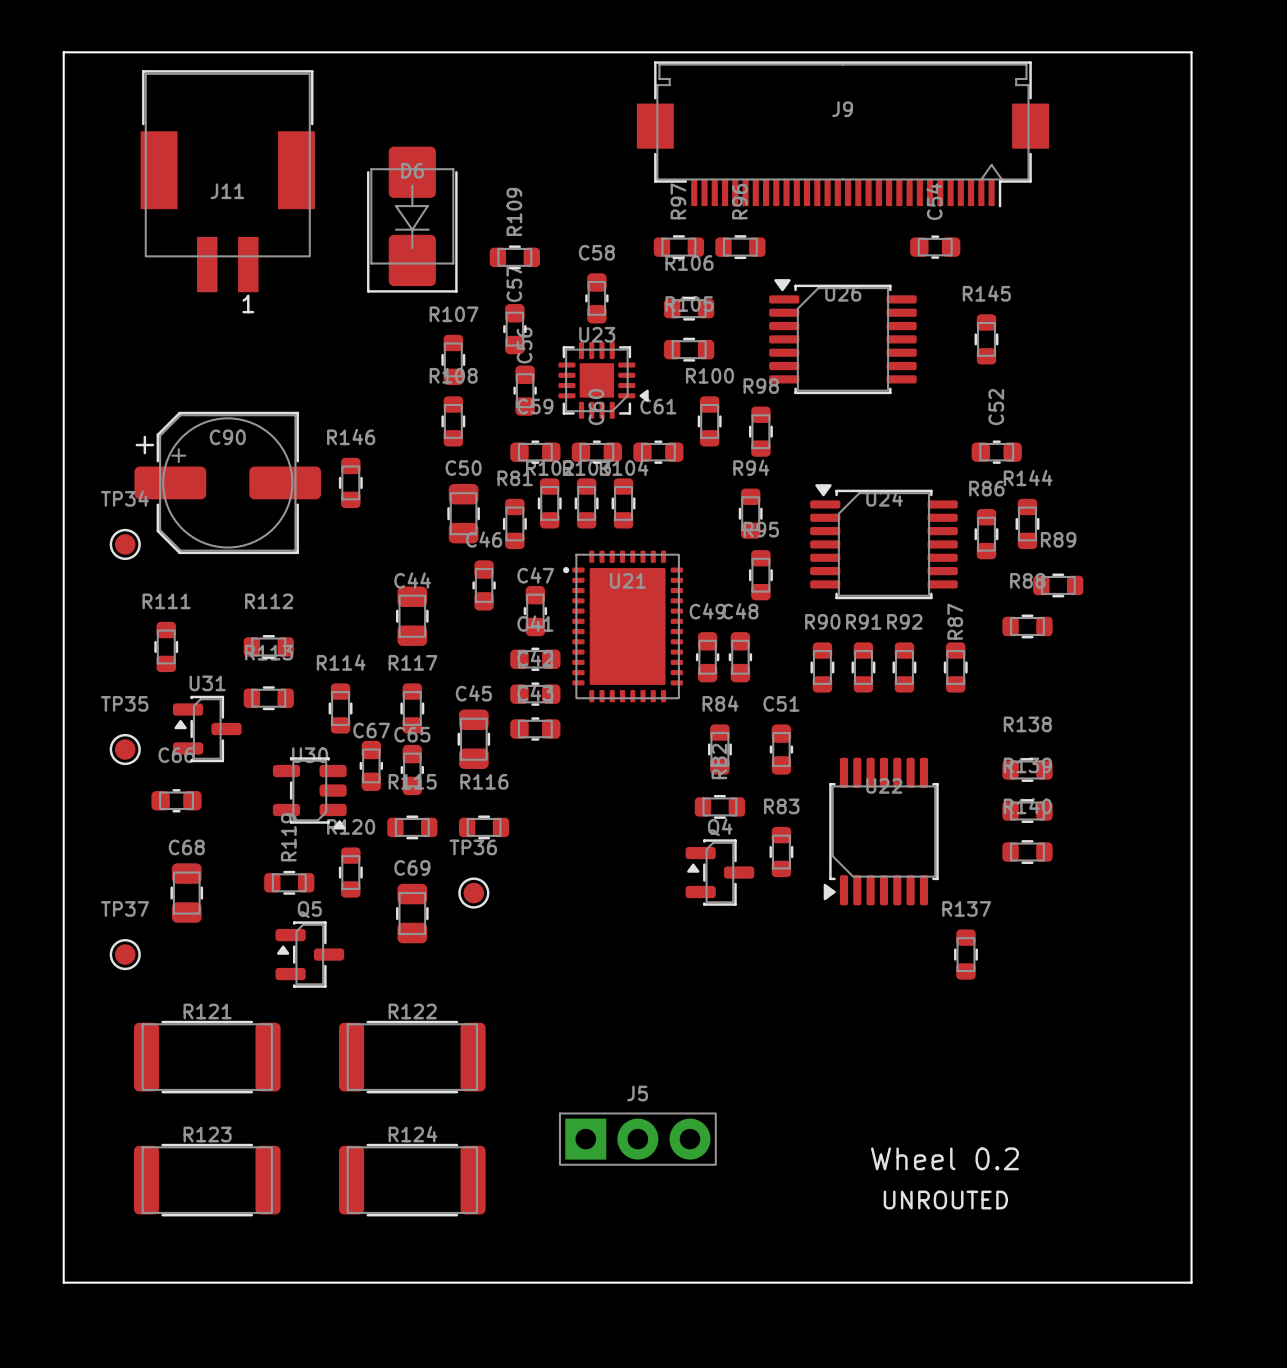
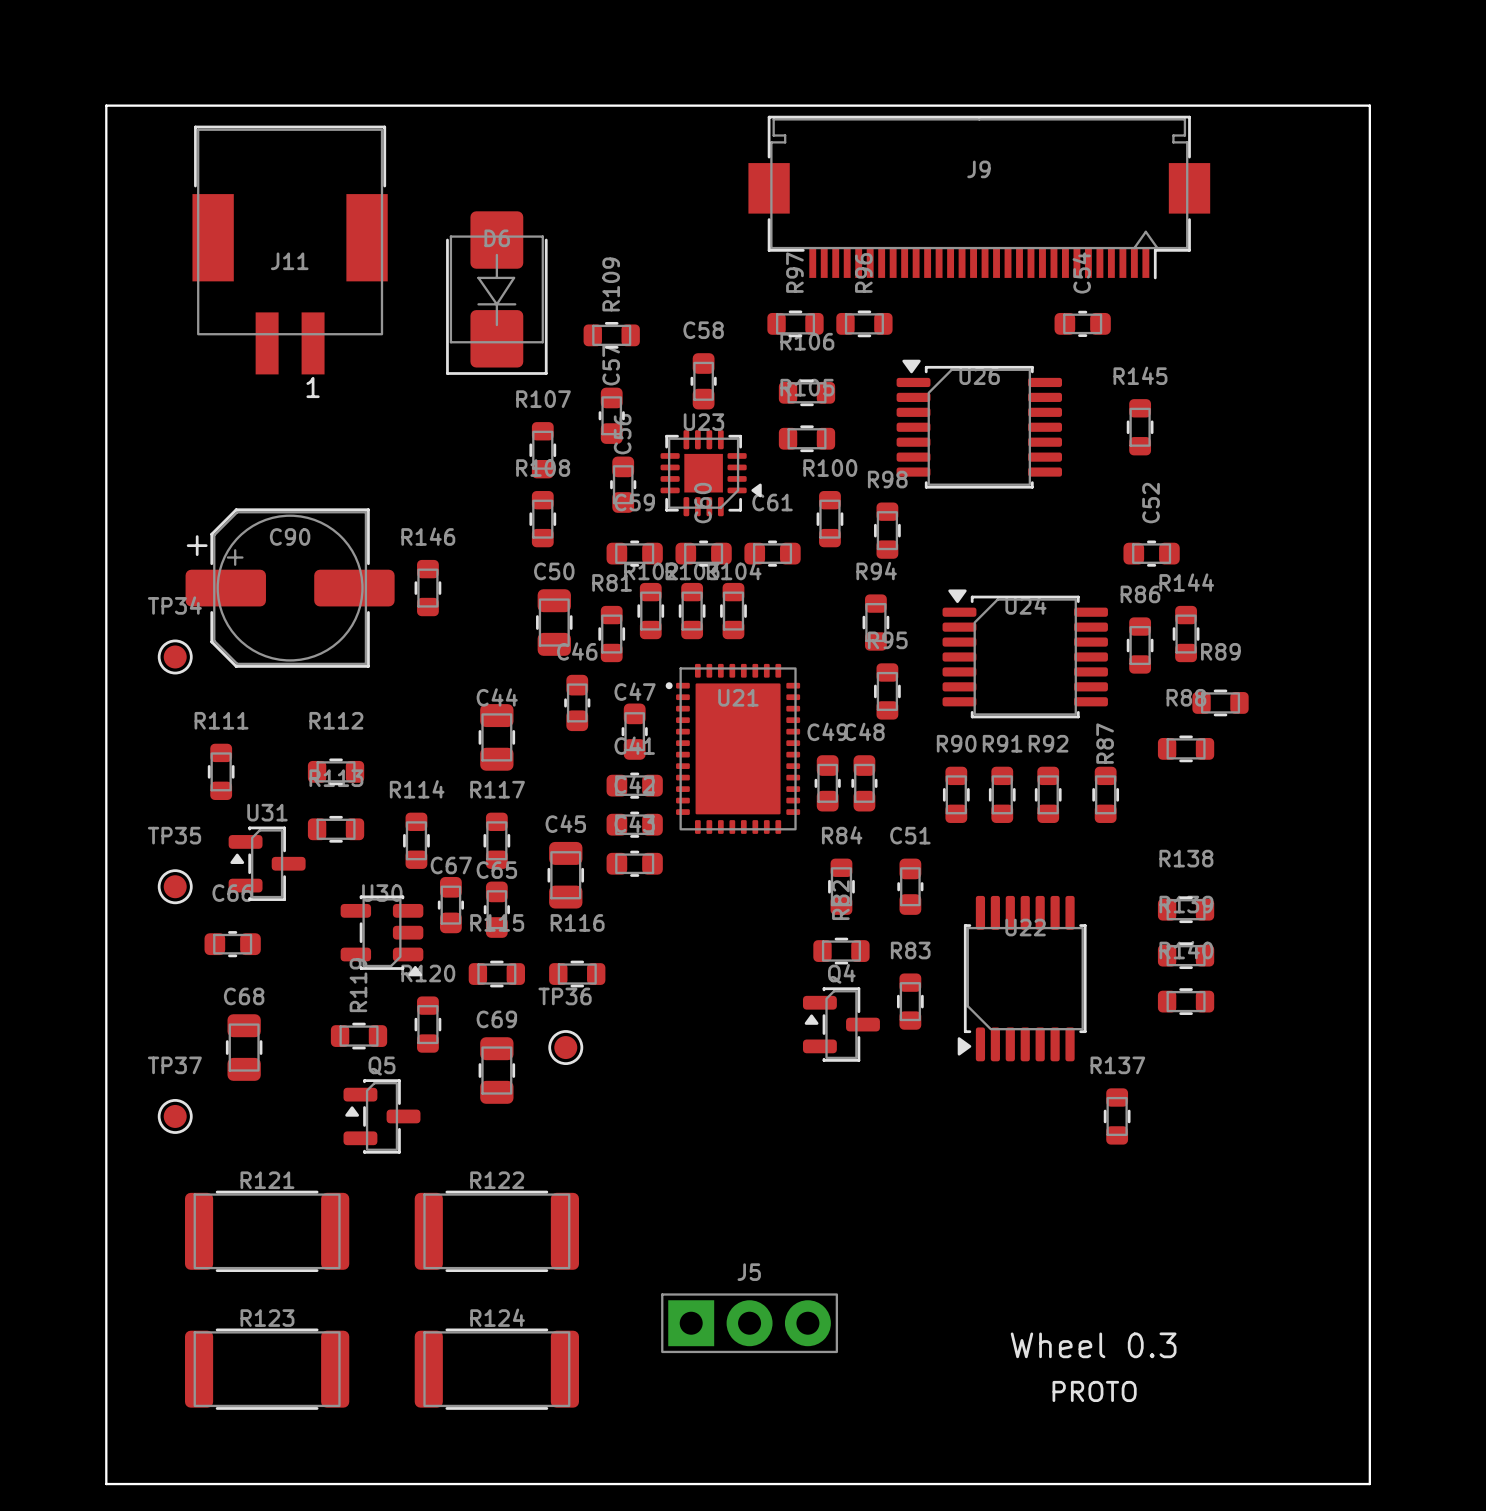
text: Wheel 0.2 (944, 1158) -> Wheel 0.3 (1093, 1345)
text: UNROUTED (945, 1200) -> PROTO (1094, 1391)

